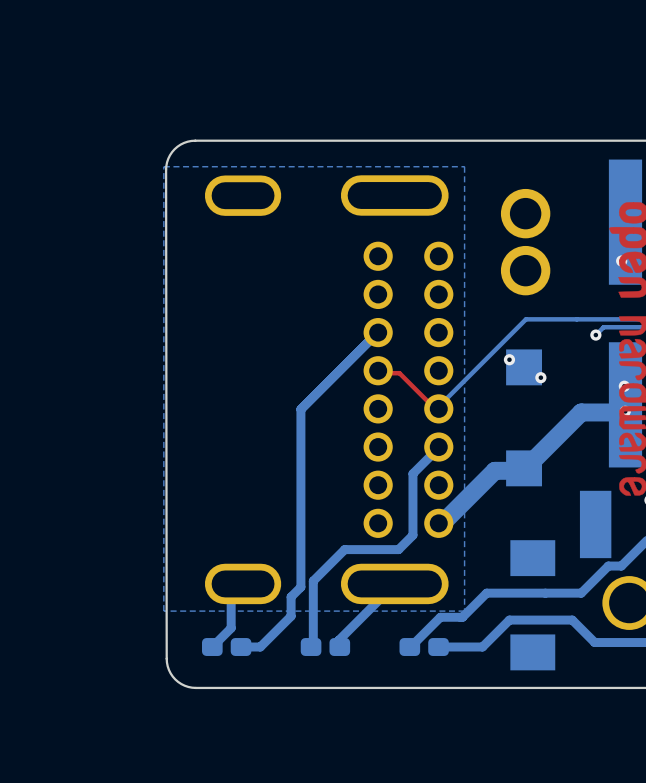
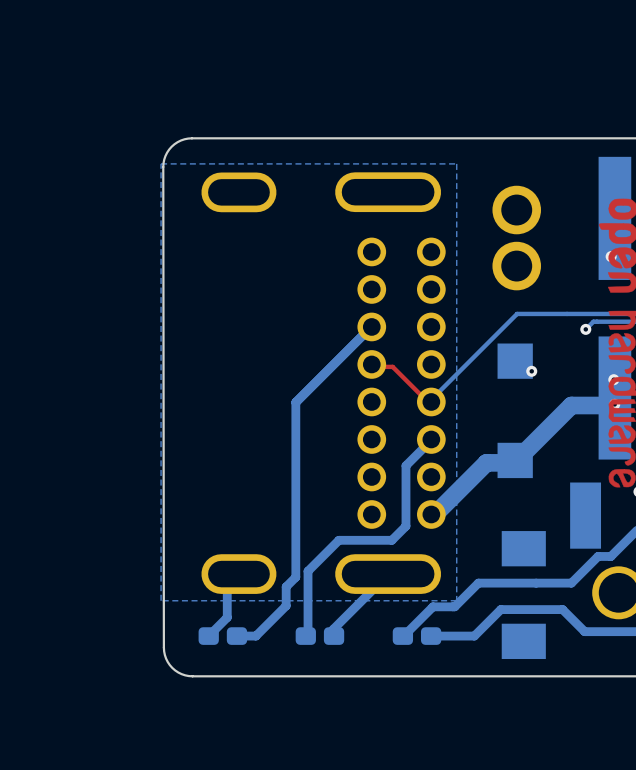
via: (509, 359) -> none

